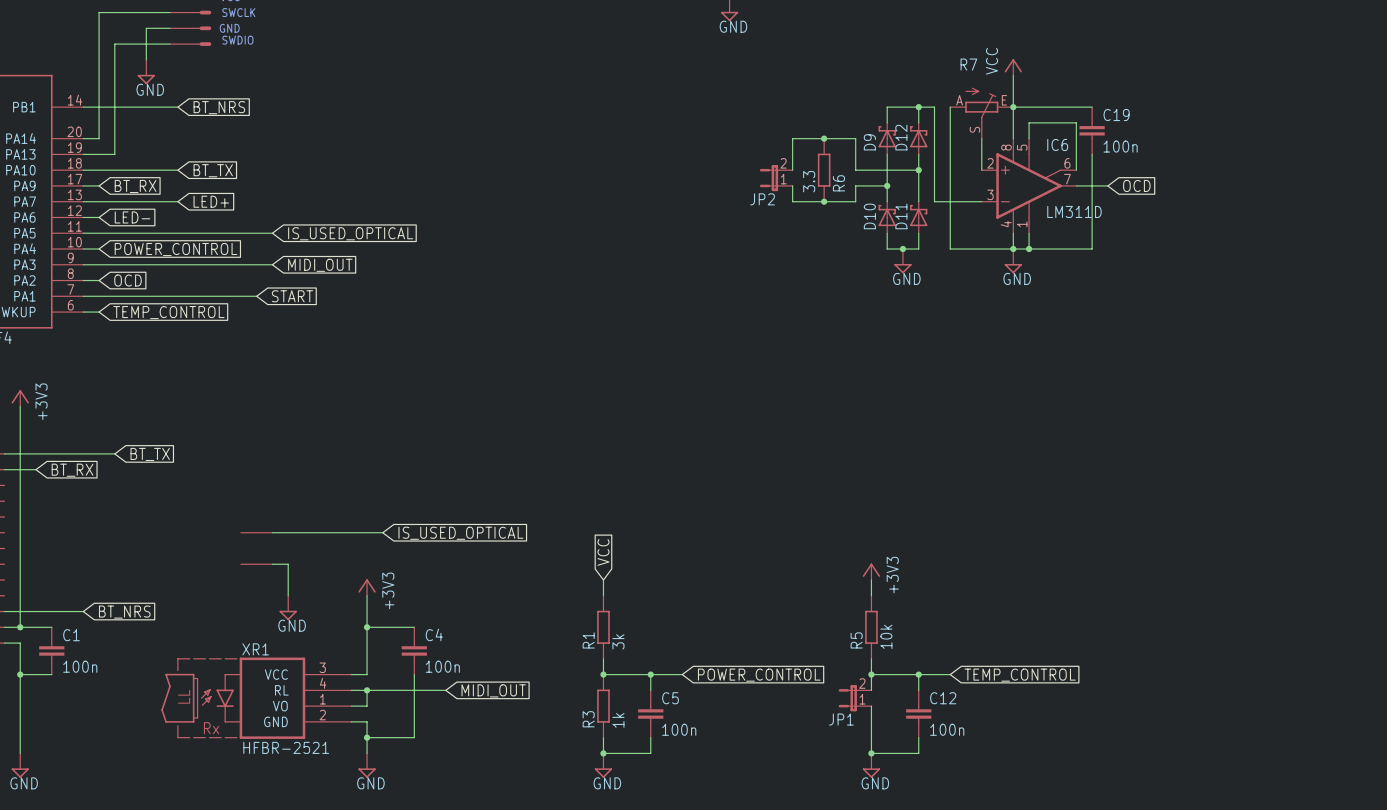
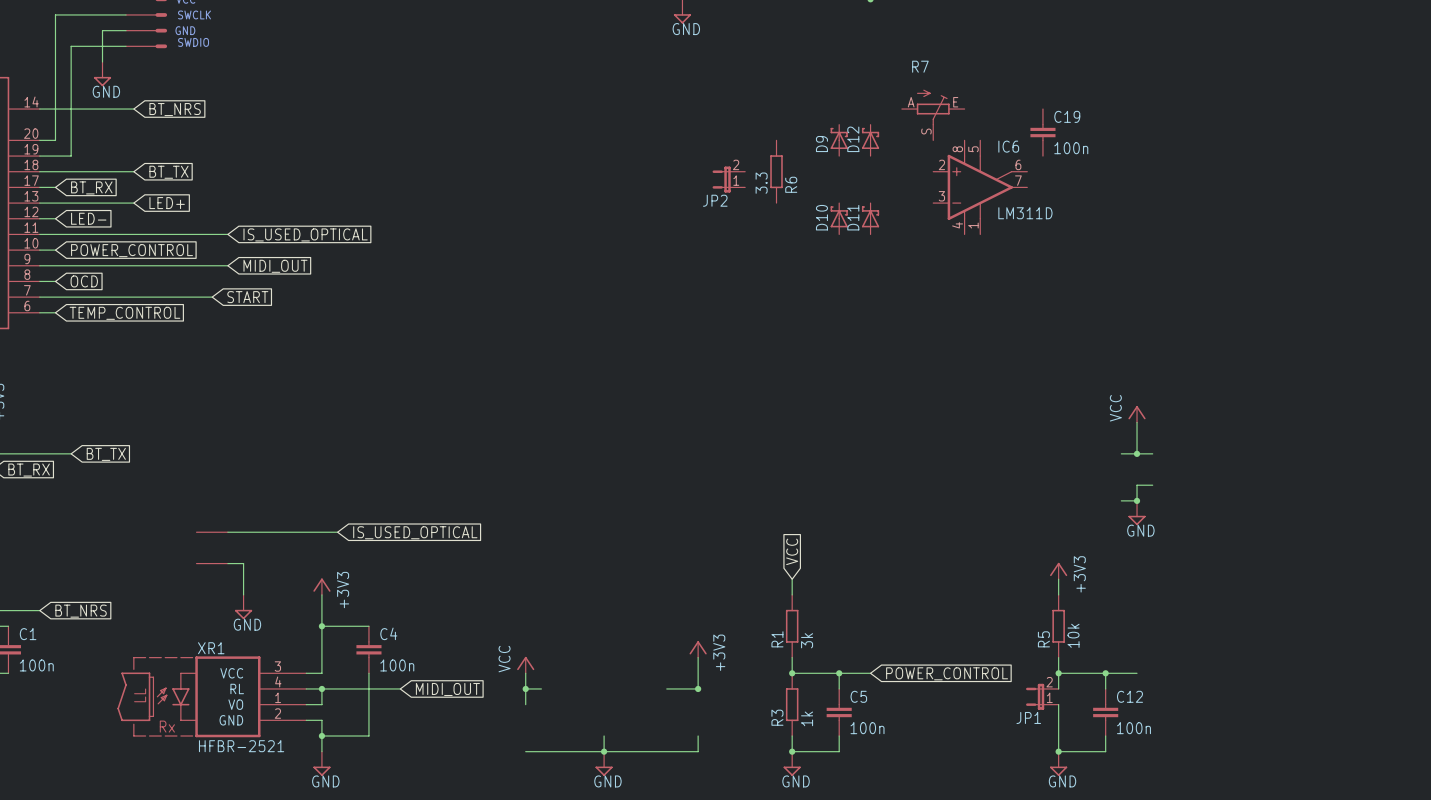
power symbol: VCC (1013, 67) -> none
wire: (1013, 75) (1013, 138) -> none
wire: (918, 107) (918, 122) -> none
junction: (918, 107) -> none
wire: (950, 107) (950, 249) (1092, 249) (1092, 154) -> none
wire: (1013, 107) (1092, 107) -> none
junction: (1013, 107) -> none
wire: (887, 122) (887, 107) (934, 107) (934, 201) (981, 201) -> none
junction: (824, 138) -> none
wire: (981, 138) (981, 170) -> none
wire: (1029, 138) (1029, 122) (1076, 122) (1076, 170) -> none
wire: (887, 154) (887, 201) -> none
wire: (918, 154) (918, 201) -> none
wire: (792, 170) (792, 138) (855, 138) (855, 170) (918, 170) -> none
junction: (918, 170) -> none
wire: (792, 185) (792, 201) (855, 201) (855, 185) (887, 185) -> none
junction: (887, 185) -> none
wire: (1076, 185) (1107, 185) -> none
global label: OCD (1136, 185) -> none
junction: (824, 201) -> none
wire: (887, 233) (887, 249) (918, 249) (918, 233) -> none
wire: (1013, 233) (1013, 249) -> none
wire: (1029, 233) (1029, 249) -> none
junction: (902, 249) -> none
junction: (1013, 249) -> none
junction: (1029, 249) -> none
power symbol: GND (902, 261) -> none
power symbol: GND (1013, 261) -> none
power symbol: none -> VCC (1137, 414)
wire: none -> (1137, 422) (1137, 453)
wire: none -> (1121, 453) (1152, 453)
junction: none -> (1137, 453)
wire: none -> (1152, 485) (1137, 485) (1137, 500) (1121, 500)
junction: none -> (1137, 500)
power symbol: none -> GND (1137, 513)
global label: VCC (603, 552) -> none
global label: none -> VCC (792, 551)
power symbol: +3V3 (871, 571) -> none
power symbol: none -> +3V3 (1058, 571)
wire: (603, 580) (603, 595) -> none
wire: (871, 580) (871, 595) -> (792, 579) (792, 594)
wire: none -> (1058, 579) (1058, 594)
R1 position: (603, 627) -> (792, 626)
R5 position: (871, 627) -> (1058, 626)
power symbol: none -> +3V3 (698, 649)
wire: (603, 658) (603, 674) (682, 674) -> none
wire: none -> (698, 657) (698, 688) (666, 688)
wire: none -> (792, 657) (792, 673) (823, 673)
wire: (871, 658) (871, 690) -> none
wire: none -> (1058, 657) (1058, 688)
power symbol: none -> VCC (525, 665)
wire: none -> (525, 673) (525, 704)
junction: (603, 674) -> none
wire: (650, 674) (650, 690) -> none
junction: (650, 674) -> none
junction: none -> (792, 673)
junction: (871, 674) -> none
wire: none -> (839, 673) (839, 688)
junction: none -> (839, 673)
junction: (918, 674) -> none
wire: (950, 674) (918, 674) (918, 690) -> none
wire: none -> (1058, 673) (1137, 673)
junction: none -> (1058, 673)
wire: none -> (1105, 673) (1105, 688)
junction: none -> (1105, 673)
global label: POWER_CONTROL (759, 675) -> none
global label: TEMP_CONTROL (1020, 675) -> POWER_CONTROL (947, 673)
wire: none -> (525, 688) (541, 688)
junction: none -> (525, 688)
junction: none -> (698, 688)
JP1 position: (855, 698) -> (1042, 696)
R3 position: (603, 706) -> (792, 704)
wire: (871, 706) (871, 753) -> (792, 736) (792, 751) (823, 751)
wire: none -> (1058, 704) (1058, 751) (1105, 751) (1105, 736)
C5 position: (650, 714) -> (839, 712)
C12 position: (918, 714) -> (1105, 712)
wire: (603, 737) (603, 753) -> (525, 751) (557, 751)
wire: none -> (698, 736) (698, 751) (604, 751)
wire: (918, 737) (918, 753) (887, 753) -> (839, 736) (839, 751)
junction: (603, 753) -> none
junction: none -> (604, 751)
junction position: (871, 753) -> (792, 751)
junction: none -> (1058, 751)
power symbol position: GND (603, 765) -> GND (604, 763)
power symbol position: GND (871, 765) -> GND (792, 763)
power symbol: none -> GND (1058, 763)

